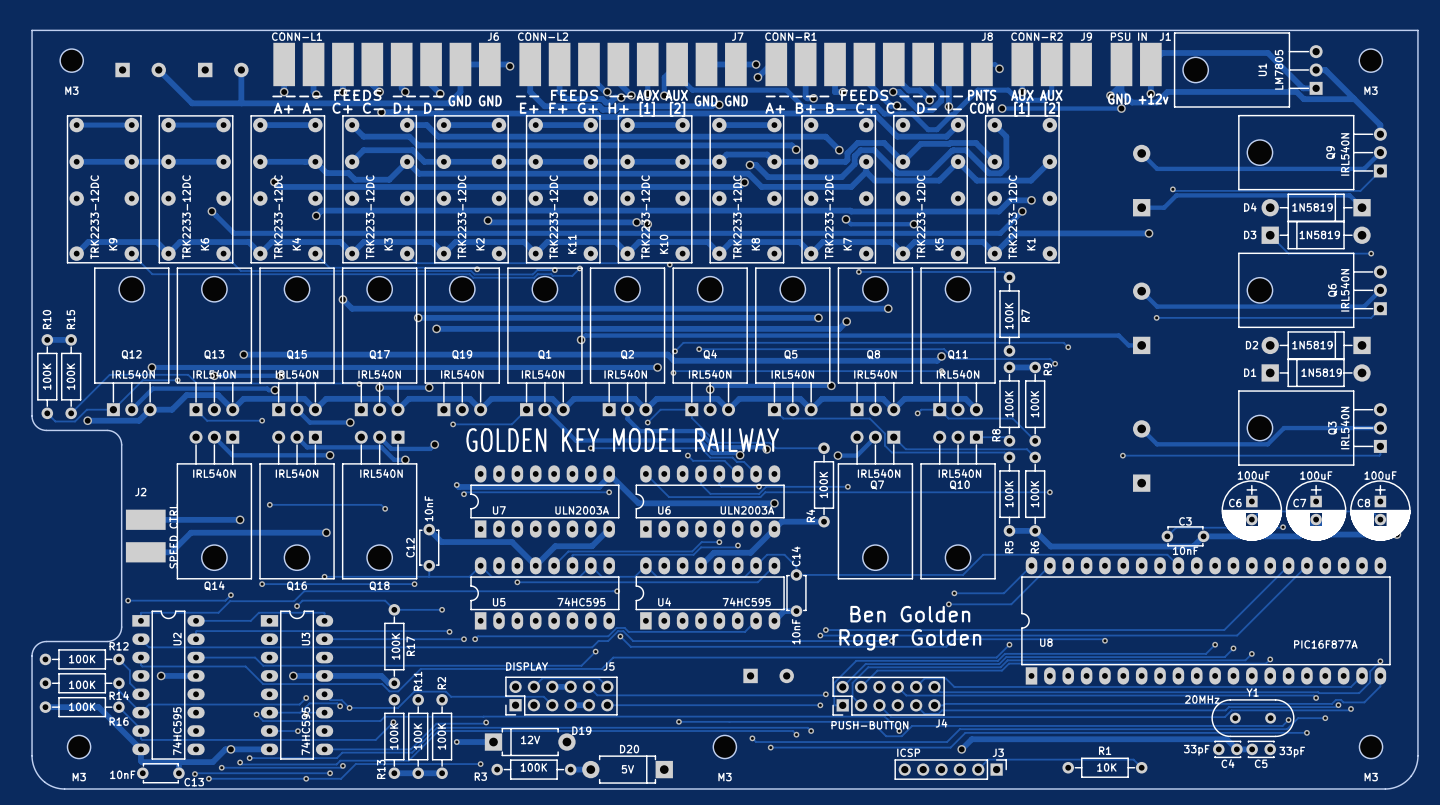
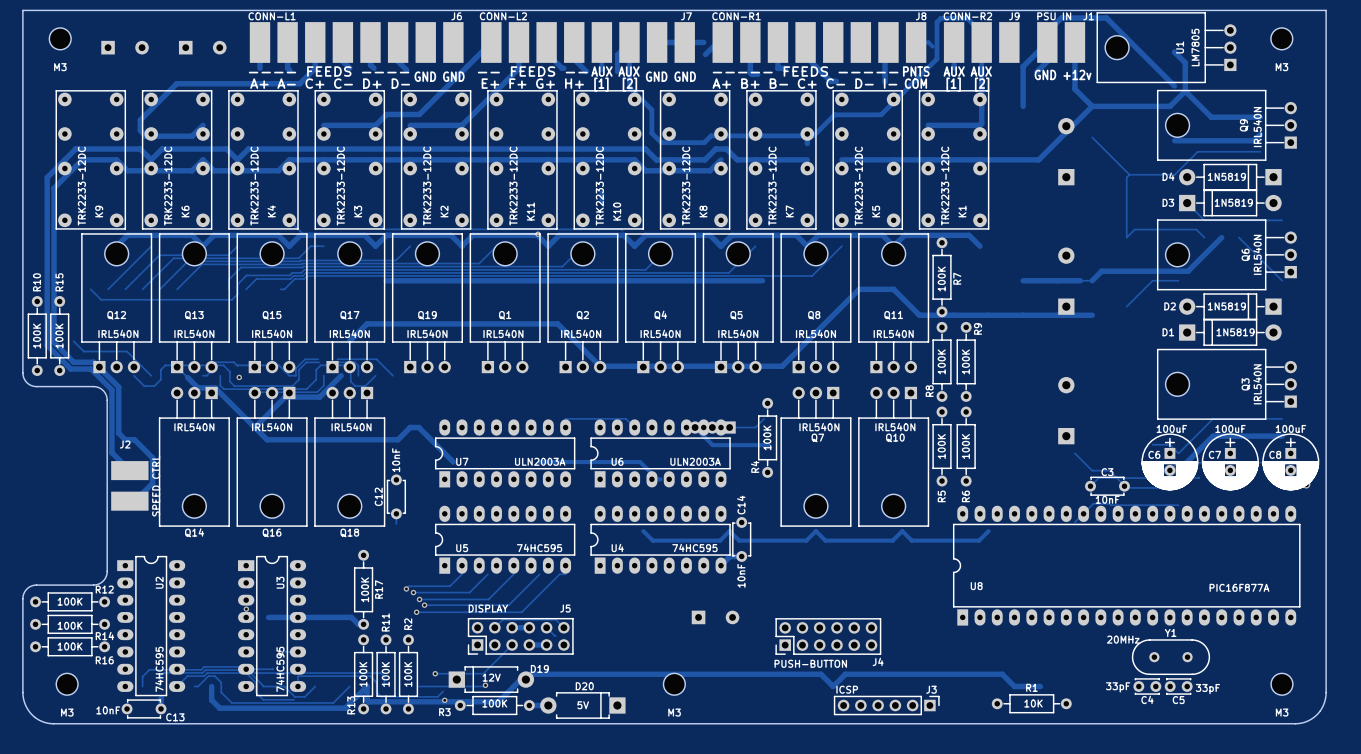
track: (530, 64) (530, 91) (544, 106) (599, 106) (602, 109) (615, 109) (618, 106) (719, 104) -> (491, 42) (419, 114) (386, 114) (375, 125) (323, 125)
via: (756, 64) -> none
track: (893, 64) (893, 75) (908, 90) (919, 90) (929, 100) -> none
track: (923, 64) (923, 75) (941, 93) (941, 100) (931, 110) (918, 110) (899, 91) (893, 91) -> none
track: (1121, 64) (1121, 91) (1132, 102) (1156, 102) (1167, 91) (1296, 91) (1303, 99) (1353, 98) -> none
track: (1150, 64) (1162, 53) (1267, 53) (1303, 88) (1316, 88) -> none
track: (510, 66) (508, 64) (460, 64) (460, 91) (449, 103) (192, 103) (158, 69) -> none
via: (510, 66) -> none
via: (999, 68) -> none
track: (241, 69) (241, 103) -> none
track: (1316, 69) (1325, 69) (1380, 125) (1380, 134) -> none
track: (677, 74) (692, 90) (786, 90) (802, 106) (877, 106) (884, 113) (912, 113) (928, 129) (936, 129) (977, 90) (1008, 90) (1018, 100) (1042, 100) (1051, 91) -> (629, 52) (629, 87) (651, 109) (651, 133) (661, 142) (704, 142) (711, 135) (813, 135) (834, 114) (881, 114) (937, 58) (937, 22) (940, 18) (967, 18) (981, 32) (981, 42)
track: none -> (1174, 51) (1185, 62) (1185, 91)
via: (757, 77) -> none
track: none -> (315, 68) (299, 83) (176, 83) (140, 120) (140, 130) (146, 136) (192, 136) (203, 125)
via: (379, 91) -> none
via: (405, 91) -> none
track: (559, 91) (566, 99) (602, 99) (605, 102) (610, 102) (615, 97) (621, 97) -> (518, 68) (462, 125) (410, 125)
via: (607, 91) -> none
via: (893, 91) -> none
via: (1022, 91) -> none
track: none -> (981, 67) (981, 123) (979, 125) (928, 125)
via: (284, 92) -> none
via: (342, 92) -> none
via: (842, 92) -> none
via: (440, 93) -> none
via: (647, 93) -> none
track: none -> (1074, 70) (1074, 89) (1092, 106)
via: (1150, 93) -> none
via: (316, 94) -> none
via: (631, 95) -> none
via: (664, 95) -> none
via: (1110, 95) -> none
via: (621, 97) -> none
via: (813, 98) -> none
via: (929, 100) -> none
via: (719, 104) -> none
via: (897, 105) -> none
via: (948, 106) -> none
track: (1002, 108) (1121, 108) -> none
via: (1002, 108) -> none
via: (1121, 108) -> none
track: none -> (1174, 85) (1106, 18) (1061, 18) (1047, 32) (1047, 42) (1023, 66) (1023, 106)
track: (381, 112) (596, 113) (599, 116) (618, 116) (621, 113) (874, 113) (897, 136) (946, 136) (958, 125) -> none
via: (381, 112) -> none
track: none -> (1185, 91) (1170, 106) (1092, 106)
track: none -> (1185, 91) (1211, 117) (1260, 117)
track: (76, 125) (131, 125) -> none
track: (168, 125) (223, 125) -> none
track: (260, 125) (315, 125) -> none
track: (352, 125) (363, 136) (409, 136) (418, 145) (791, 145) (796, 149) -> none
track: (407, 125) (426, 125) (438, 136) (825, 136) (839, 150) -> none
track: (443, 125) (499, 125) -> none
track: (535, 125) (590, 125) -> none
track: (627, 125) (682, 125) -> none
track: (719, 125) (774, 125) -> none
track: (994, 125) (1006, 136) (1006, 167) (1000, 173) (989, 173) (966, 150) (951, 151) (929, 173) (897, 173) (874, 150) (860, 150) (854, 156) (854, 164) (841, 177) (768, 177) (756, 165) (749, 165) -> none
track: none -> (1092, 106) (1038, 159) (841, 159)
via: (796, 149) -> none
via: (839, 150) -> none
track: (1380, 152) (1364, 168) (1157, 168) (1141, 153) -> none
track: (76, 161) (223, 161) -> none
track: (260, 161) (315, 161) (326, 173) (348, 173) (355, 179) (389, 179) (407, 161) (419, 173) (748, 173) (761, 186) (851, 186) (866, 172) (874, 180) (939, 180) (958, 161) (976, 180) (1031, 180) (1049, 161) -> none
track: (352, 161) (363, 150) (412, 150) (424, 161) (719, 161) (726, 154) (767, 154) (774, 161) (845, 161) (847, 153) (857, 143) (884, 143) (902, 161) (920, 143) (975, 143) (994, 161) -> none
track: none -> (1260, 134) (1253, 140) (1174, 140)
via: (749, 165) -> none
track: none -> (1092, 137) (1129, 174)
track: (1380, 170) (1360, 190) (1174, 190) (1172, 189) -> none
track: none -> (1260, 151) (1197, 151) (1174, 174) (1129, 174)
track: (274, 181) (279, 186) (739, 186) (744, 182) -> none
via: (274, 181) -> none
via: (744, 182) -> none
via: (1172, 189) -> none
track: (1031, 200) (1010, 200) (998, 211) (321, 210) (316, 215) -> none
via: (1031, 200) -> none
track: none -> (1129, 174) (1126, 177) (1126, 237) (1134, 229) (1196, 229) (1204, 237)
track: (1141, 207) (1164, 207) (1176, 195) (1349, 195) (1362, 207) -> none
track: (211, 211) (233, 233) (1000, 233) (1022, 211) -> none
via: (211, 211) -> none
via: (1022, 211) -> none
via: (316, 215) -> none
track: (846, 219) (850, 224) (913, 224) -> none
via: (846, 219) -> none
track: (487, 220) (489, 222) (636, 222) -> none
via: (487, 220) -> none
via: (636, 222) -> none
via: (647, 224) -> none
via: (913, 224) -> none
track: (1149, 233) (1014, 233) (994, 253) (983, 242) (914, 242) (902, 253) (891, 242) (822, 242) (811, 253) (799, 242) (730, 242) (719, 253) (707, 242) (639, 242) (627, 253) (615, 242) (547, 242) (535, 253) (524, 242) (455, 242) (443, 253) (432, 242) (363, 242) (352, 253) (340, 242) (271, 242) (260, 253) (248, 242) (180, 242) (168, 253) (156, 242) (88, 242) (76, 253) -> none
via: (1149, 233) -> none
track: (131, 253) (152, 274) (469, 274) (473, 277) (534, 277) (537, 274) (572, 275) (579, 268) -> none
track: (223, 253) (240, 270) (471, 270) (474, 274) (532, 274) (537, 270) (554, 270) -> none
via: (1371, 253) -> none
via: (669, 264) -> none
via: (477, 269) -> none
via: (554, 270) -> none
track: (858, 271) (1003, 271) (1009, 277) -> none
via: (858, 271) -> none
track: none -> (1221, 237) (1188, 271) (1101, 271) (1092, 280)
track: none -> (1238, 237) (1282, 280)
track: none -> (116, 246) (127, 235) (192, 235) (203, 246) (213, 235) (278, 235) (289, 246) (300, 235) (364, 235) (375, 246) (386, 235) (451, 235) (462, 246) (472, 235) (537, 235) (548, 246) (559, 235) (623, 235) (634, 246) (645, 235) (710, 235) (721, 246) (731, 235) (796, 235) (807, 246) (818, 235) (882, 235) (893, 246) (904, 235) (969, 235) (979, 246)
track: none -> (151, 246) (108, 289)
track: none -> (237, 246) (228, 255) (159, 255) (125, 289)
track: none -> (323, 246) (310, 246) (298, 258) (173, 258) (142, 289)
track: none -> (410, 246) (395, 260) (187, 261) (159, 289)
track: none -> (496, 246) (479, 263) (202, 264) (177, 289)
track: none -> (582, 246) (562, 266) (240, 267) (228, 279) (228, 289)
track: none -> (669, 246) (645, 269) (304, 269) (301, 272) (292, 272) (289, 275) (246, 275) (237, 284) (237, 294) (232, 299) (101, 299) (90, 289)
track: none -> (755, 246) (728, 272) (305, 272) (302, 275) (293, 275) (290, 279) (256, 279) (246, 289)
track: none -> (841, 246) (812, 275) (307, 275) (304, 279) (294, 279) (284, 289) (280, 289)
track: (1380, 290) (1364, 306) (1157, 306) (1141, 291) -> none
track: (342, 299) (352, 308) (888, 308) -> none
via: (342, 299) -> none
via: (888, 308) -> none
track: (1380, 308) (1371, 317) (1261, 317) -> none
via: (418, 317) -> none
via: (818, 317) -> none
track: none -> (1023, 280) (1080, 280)
via: (1156, 317) -> none
track: (1169, 317) (1233, 317) -> (1126, 306) (1152, 280)
track: (846, 321) (839, 328) (436, 328) -> none
via: (846, 321) -> none
via: (436, 328) -> none
track: (47, 339) (71, 339) -> none
track: (581, 339) (585, 335) (1118, 335) (1128, 345) (1141, 345) -> none
via: (581, 339) -> none
track: (1068, 347) (1063, 342) (683, 342) (675, 351) -> none
via: (1068, 347) -> none
track: (699, 349) (944, 349) (954, 359) (1050, 359) (1055, 363) -> none
via: (699, 349) -> none
via: (675, 351) -> none
track: (243, 354) (667, 354) (673, 360) (937, 360) (941, 356) -> none
via: (243, 354) -> none
track: none -> (1092, 315) (919, 315) (893, 289) (859, 289) (782, 366) (600, 366) (557, 323) (367, 323) (349, 341)
via: (941, 356) -> none
via: (1055, 363) -> none
track: (151, 367) (657, 367) -> none
via: (151, 367) -> none
via: (657, 367) -> none
track: (1009, 367) (1035, 367) -> none
track: (941, 371) (675, 371) (673, 372) -> none
via: (941, 371) -> none
via: (673, 372) -> none
track: (214, 375) (280, 375) -> none
via: (214, 375) -> none
via: (280, 375) -> none
track: (177, 380) (142, 380) (113, 409) (86, 409) (75, 421) (55, 421) (47, 413) -> none
via: (177, 380) -> none
track: none -> (73, 341) (83, 351) (127, 351) (151, 375)
track: (359, 383) (196, 383) (188, 374) (109, 374) (71, 413) -> none
via: (359, 383) -> none
track: (831, 385) (713, 385) (710, 389) -> none
via: (831, 385) -> none
track: (379, 387) (429, 387) -> none
via: (379, 387) -> none
via: (429, 387) -> none
via: (710, 389) -> none
track: (274, 390) (152, 388) (131, 409) -> none
via: (274, 390) -> none
track: none -> (318, 359) (305, 359) (295, 368) (295, 375) (289, 375) (278, 365) (237, 365) (233, 362) (215, 362) (212, 365) (165, 365) (160, 369) (160, 379) (154, 386) (144, 386) (133, 375)
track: none -> (337, 359) (376, 359) (392, 375)
track: none -> (319, 362) (306, 362) (298, 369) (298, 379) (292, 386) (234, 386) (229, 381) (229, 371) (223, 365) (217, 365) (206, 375) (203, 375)
track: none -> (338, 362) (354, 362) (358, 365) (358, 375)
track: none -> (327, 365) (320, 365) (316, 369) (316, 379) (306, 389) (223, 389) (220, 385) (220, 375)
track: none -> (339, 365) (344, 365) (350, 371) (350, 381) (355, 386) (365, 386) (375, 375)
track: (297, 409) (309, 422) (350, 422) -> none
track: (526, 409) (511, 424) (453, 424) -> none
track: (544, 409) (575, 440) (699, 440) (712, 453) (737, 453) (740, 455) -> none
track: (627, 409) (627, 418) (639, 431) (698, 431) (714, 447) (764, 447) (766, 449) -> none
track: (774, 409) (783, 418) (869, 418) (884, 433) (884, 445) (891, 452) (1004, 452) (1009, 457) -> none
track: (976, 409) (965, 398) (904, 398) (893, 409) (882, 398) (822, 398) (811, 409) (800, 398) (739, 398) (728, 409) (717, 398) (656, 398) (645, 409) (635, 398) (574, 398) (563, 409) (552, 398) (491, 398) (480, 409) (469, 398) (408, 398) (398, 409) (387, 398) (326, 398) (315, 409) (304, 398) (243, 398) (232, 409) (218, 395) (186, 395) (172, 409) (150, 409) (139, 420) (87, 420) -> none
track: (917, 413) (921, 409) (939, 409) (948, 418) (1012, 418) (1035, 440) -> none
via: (917, 413) -> none
track: none -> (323, 375) (323, 385) (317, 392) (258, 392) (256, 394)
track: none -> (341, 375) (319, 397) (285, 397) (254, 427)
via: (87, 420) -> none
track: (207, 420) (262, 420) -> (187, 377) (197, 387) (215, 387) (267, 439) (397, 439) (410, 427) (418, 427) (453, 462)
via: (350, 422) -> none
track: (647, 422) (660, 409) (691, 409) (691, 418) (716, 442) (770, 442) (775, 448) (824, 448) -> none
via: (647, 422) -> none
via: (453, 424) -> none
track: (1380, 428) (1284, 428) (1267, 444) (1157, 444) (1141, 428) -> none
track: (214, 437) (232, 455) (330, 455) -> none
track: (297, 437) (307, 447) (381, 447) (394, 459) (405, 459) -> none
track: (379, 437) (391, 448) (430, 448) (434, 444) -> none
track: (875, 437) (857, 455) (837, 455) -> none
track: (893, 437) (905, 449) (1027, 449) (1035, 457) -> none
track: (976, 437) (1005, 437) (1009, 440) -> none
text: GOLDEN KEY MODEL RAILWAY (622, 440) -> none
via: (434, 444) -> none
track: (1380, 446) (1379, 455) (1122, 455) -> none
track: (590, 448) (701, 448) (710, 457) (732, 457) (736, 461) (744, 461) (756, 473) -> none
via: (590, 448) -> none
via: (766, 449) -> none
via: (330, 455) -> none
track: (687, 455) (693, 460) (724, 460) (737, 473) -> none
via: (687, 455) -> none
via: (740, 455) -> none
via: (837, 455) -> none
via: (1122, 455) -> none
via: (405, 459) -> none
track: none -> (565, 418) (626, 418) (634, 427)
track: none -> (764, 418) (755, 427) (729, 427)
track: none -> (1282, 418) (1213, 418) (1178, 453) (1169, 444) (1152, 444)
track: (645, 473) (669, 497) (760, 497) (765, 492) (1049, 492) -> none
track: (700, 473) (700, 484) (710, 493) (759, 493) (766, 486) (847, 486) -> none
track: (719, 473) (719, 484) (721, 486) (759, 486) -> none
track: none -> (695, 427) (712, 445) (768, 445)
part: none -> (712, 427)
track: none -> (1282, 436) (1213, 436) (1178, 470) (1160, 470) (1152, 478)
track: (456, 484) (458, 486) (599, 486) (609, 476) (609, 473) (638, 503) (774, 503) -> none
via: (456, 484) -> none
via: (759, 486) -> none
via: (847, 486) -> none
track: (609, 492) (465, 492) (464, 494) -> none
via: (609, 492) -> none
via: (1049, 492) -> none
via: (464, 494) -> none
track: none -> (1074, 453) (1092, 470) (1109, 470) (1126, 487) (1178, 487)
via: (774, 503) -> none
track: (269, 504) (381, 504) (385, 508) -> none
via: (269, 504) -> none
via: (385, 508) -> none
track: none -> (539, 462) (640, 462) (657, 479) (660, 479)
track: (145, 519) (240, 519) -> (129, 470) (111, 452) (111, 389) (91, 369) (70, 369) (47, 345) (47, 177) (75, 149) (140, 149) (151, 159) (162, 149) (226, 149) (237, 159) (248, 149) (645, 149) (656, 159) (704, 159) (715, 149) (726, 149) (737, 159) (807, 159)
via: (240, 519) -> none
track: (824, 521) (781, 521) (750, 552) (714, 552) (700, 565) -> none
via: (1283, 527) -> none
track: (609, 529) (591, 546) (555, 546) (535, 565) (512, 542) (441, 542) (429, 529) -> none
track: (1009, 530) (1035, 530) (1050, 546) (1193, 546) (1203, 536) (1299, 536) (1316, 519) (1331, 534) (1396, 534) -> none
track: (326, 532) (191, 532) (171, 552) (151, 552) -> (721, 159) (710, 170) (645, 170) (634, 159) (289, 159) (278, 170) (213, 170) (203, 159) (192, 170) (127, 170) (116, 159) (82, 159) (54, 188) (54, 342) (73, 362) (93, 362) (118, 387) (118, 433) (125, 439) (134, 439) (152, 457) (152, 483) (134, 501)
via: (326, 532) -> none
track: (719, 542) (701, 542) (692, 551) (568, 551) (554, 565) -> none
via: (719, 542) -> none
track: (737, 545) (736, 547) (700, 547) (693, 554) (573, 554) (572, 565) -> none
via: (737, 545) -> none
track: none -> (1178, 505) (1093, 503) (1074, 522)
track: (774, 565) (757, 582) (517, 582) -> none
track: (1031, 565) (1003, 593) (954, 593) -> none
track: (1049, 565) (1011, 604) (948, 604) -> none
track: (1178, 565) (1167, 554) (983, 554) (962, 574) (796, 574) (796, 566) (784, 554) (767, 554) (745, 576) (656, 576) (645, 565) (634, 576) (601, 576) (590, 565) (579, 576) (491, 576) (480, 565) (469, 576) (324, 576) -> none
track: (1288, 565) (1224, 630) (825, 630) -> none
track: (1306, 565) (1237, 635) (820, 635) -> none
via: (324, 576) -> none
via: (517, 582) -> none
track: (262, 584) (414, 584) -> none
via: (262, 584) -> none
via: (414, 584) -> none
track: none -> (643, 531) (652, 540) (720, 540) (729, 531) (739, 540) (806, 540) (815, 531) (825, 540) (892, 540) (902, 531) (911, 540) (979, 540) (988, 531)
track: (617, 591) (304, 591) (294, 601) (230, 601) (218, 612) (141, 612) (140, 620) -> none
via: (617, 591) -> none
via: (954, 593) -> none
track: (230, 595) (225, 600) (128, 600) -> none
via: (230, 595) -> none
via: (128, 600) -> none
via: (948, 604) -> none
track: (297, 606) (302, 600) (385, 600) (394, 609) (442, 609) -> none
via: (297, 606) -> none
via: (442, 609) -> none
text: Ben Golden (910, 614) -> none
track: (196, 620) (250, 620) (258, 612) (324, 612) (324, 620) -> none
track: (756, 620) (745, 631) (628, 631) (624, 627) (616, 627) (608, 636) (478, 636) (475, 639) -> none
track: none -> (462, 574) (450, 586) (409, 586) (406, 588)
track: none -> (487, 574) (469, 592) (413, 592)
track: none -> (513, 574) (488, 599) (419, 599)
track: none -> (539, 574) (508, 605) (424, 605)
track: none -> (565, 574) (559, 574) (521, 612) (416, 612)
via: (825, 630) -> none
track: (449, 631) (196, 631) (196, 639) -> none
via: (449, 631) -> none
via: (820, 635) -> none
track: (620, 636) (630, 646) (946, 646) (953, 639) (1103, 639) (1104, 640) -> none
via: (620, 636) -> none
track: (140, 639) (149, 647) (592, 647) (598, 641) (608, 641) (617, 631) (623, 631) (633, 641) (891, 641) -> none
track: (324, 639) (464, 639) -> none
via: (464, 639) -> none
via: (475, 639) -> none
text: Roger Golden (910, 639) -> none
via: (1104, 640) -> none
via: (891, 641) -> none
track: (1009, 644) (996, 657) (613, 657) (601, 668) (420, 668) (398, 691) (389, 691) (382, 684) (263, 684) (245, 666) (142, 666) (140, 657) -> none
via: (1009, 644) -> none
track: (1215, 644) (1205, 653) (1004, 653) (997, 660) (856, 660) (834, 682) (834, 704) (842, 705) -> none
via: (1215, 644) -> none
via: none -> (406, 588)
track: (1233, 648) (1224, 657) (1006, 657) (999, 664) (865, 664) (842, 687) -> none
via: (1233, 648) -> none
via: none -> (413, 592)
track: (595, 651) (581, 665) (263, 665) (255, 657) (196, 657) -> none
via: (595, 651) -> none
track: (1251, 653) (1245, 660) (1007, 660) (1000, 667) (868, 667) (852, 682) (852, 696) (861, 705) -> none
via: (1251, 653) -> none
via: none -> (419, 599)
track: (118, 659) (129, 670) (129, 683) (140, 694) -> none
track: (1270, 659) (1266, 663) (1008, 663) (1002, 670) (877, 670) (861, 687) -> none
via: (1270, 659) -> none
track: (1380, 661) (1370, 671) (1370, 682) (1359, 693) (939, 692) (934, 687) -> none
via: (1380, 661) -> none
via: none -> (424, 605)
via: none -> (246, 609)
via: none -> (416, 612)
track: (161, 675) (196, 675) -> none
via: (161, 675) -> none
via: (293, 675) -> none
track: (1362, 675) (1351, 686) (954, 686) (945, 678) (924, 678) (916, 687) -> none
track: (1380, 675) (1380, 686) (1364, 702) (1343, 702) (1340, 699) (1335, 699) (1331, 703) (934, 705) -> none
track: (118, 683) (118, 690) (140, 712) (149, 704) (299, 704) (306, 697) -> none
track: (897, 687) (906, 695) (1313, 695) (1316, 697) -> none
track: (324, 694) (330, 700) (341, 700) (349, 707) (398, 707) (414, 691) (445, 691) (451, 696) (543, 696) (552, 705) -> (435, 673) (483, 673) (512, 644)
track: (825, 694) (598, 695) -> none
via: (825, 694) -> none
via: (306, 697) -> none
via: (1316, 697) -> none
track: (607, 705) (820, 705) -> none
via: (820, 705) -> none
track: (879, 705) (891, 717) (1224, 717) (1231, 710) (1351, 708) -> none
track: (1338, 705) (1336, 707) (1228, 707) (1225, 710) (942, 710) (938, 713) (924, 713) (916, 705) -> none
via: (1338, 705) -> none
track: (340, 706) (337, 703) (309, 703) (300, 712) (269, 712) -> none
via: (340, 706) -> none
track: (45, 707) (98, 707) (140, 749) (142, 762) (212, 762) (225, 749) (269, 749) -> none
track: (118, 707) (140, 729) (142, 739) (375, 739) (393, 722) -> none
via: (349, 707) -> none
via: (1351, 708) -> none
track: (256, 714) (263, 721) (380, 721) (384, 716) (884, 716) (899, 731) -> none
via: (256, 714) -> none
track: (1325, 718) (1298, 718) (1287, 729) (959, 729) (947, 742) (756, 742) (752, 738) -> none
via: (1325, 718) -> none
track: (1288, 720) (1282, 725) (912, 725) (901, 736) (886, 736) (871, 721) (678, 721) -> none
via: (1288, 720) -> none
via: (678, 721) -> none
via: (393, 722) -> none
track: (486, 722) (436, 723) (410, 749) (324, 749) -> (443, 691) (437, 696) (381, 696) (376, 692) (376, 682) (370, 676) (298, 676) (297, 686)
via: (486, 722) -> none
via: (297, 731) -> none
track: (811, 731) (807, 727) (437, 727) (412, 752) (342, 752) (336, 758) (249, 758) -> none
via: (811, 731) -> none
via: (899, 731) -> none
track: (1306, 732) (965, 732) (950, 747) (770, 747) -> none
via: (1306, 732) -> none
track: (796, 734) (792, 731) (438, 731) (408, 760) (340, 760) (336, 764) (242, 764) (240, 762) -> none
via: (796, 734) -> none
via: none -> (435, 673)
via: (752, 738) -> none
track: (456, 742) (493, 742) -> none
via: (456, 742) -> none
via: (770, 747) -> none
track: none -> (485, 685) (418, 686)
via: none -> (485, 685)
track: none -> (142, 686) (142, 676) (149, 669) (201, 669) (204, 666) (248, 666) (254, 673) (380, 673) (384, 676) (384, 686)
track: none -> (159, 686) (159, 676) (163, 672) (202, 672) (205, 670) (247, 670) (263, 686) (284, 686) (294, 696) (304, 696) (315, 686)
track: none -> (177, 686) (187, 676) (204, 676) (207, 673) (246, 673) (255, 682) (255, 692) (263, 699) (293, 699)
track: none -> (194, 686) (198, 686) (208, 676) (214, 676) (221, 682) (221, 692) (231, 702) (333, 702) (349, 686)
via: (230, 749) -> none
track: none -> (211, 686) (211, 700) (219, 708) (345, 708) (367, 686) (367, 700) (368, 701) (498, 701) (526, 674) (820, 674) (833, 686) (845, 674) (1002, 674) (1014, 686) (1040, 686)
track: (961, 749) (971, 739) (1226, 739) (1236, 749) (1252, 749) -> none
via: (961, 749) -> none
via: (249, 758) -> none
via: (240, 762) -> none
track: (480, 764) (355, 764) (341, 778) (208, 778) -> none
track: (342, 765) (341, 767) (221, 767) -> none
via: (342, 765) -> none
via: (221, 767) -> none
track: (1141, 767) (1133, 759) (988, 759) (978, 769) -> none
track: (330, 773) (194, 774) -> none
via: (330, 773) -> none
track: (394, 773) (442, 773) -> none
via: (194, 774) -> none
via: (208, 778) -> none
via: (306, 778) -> none

